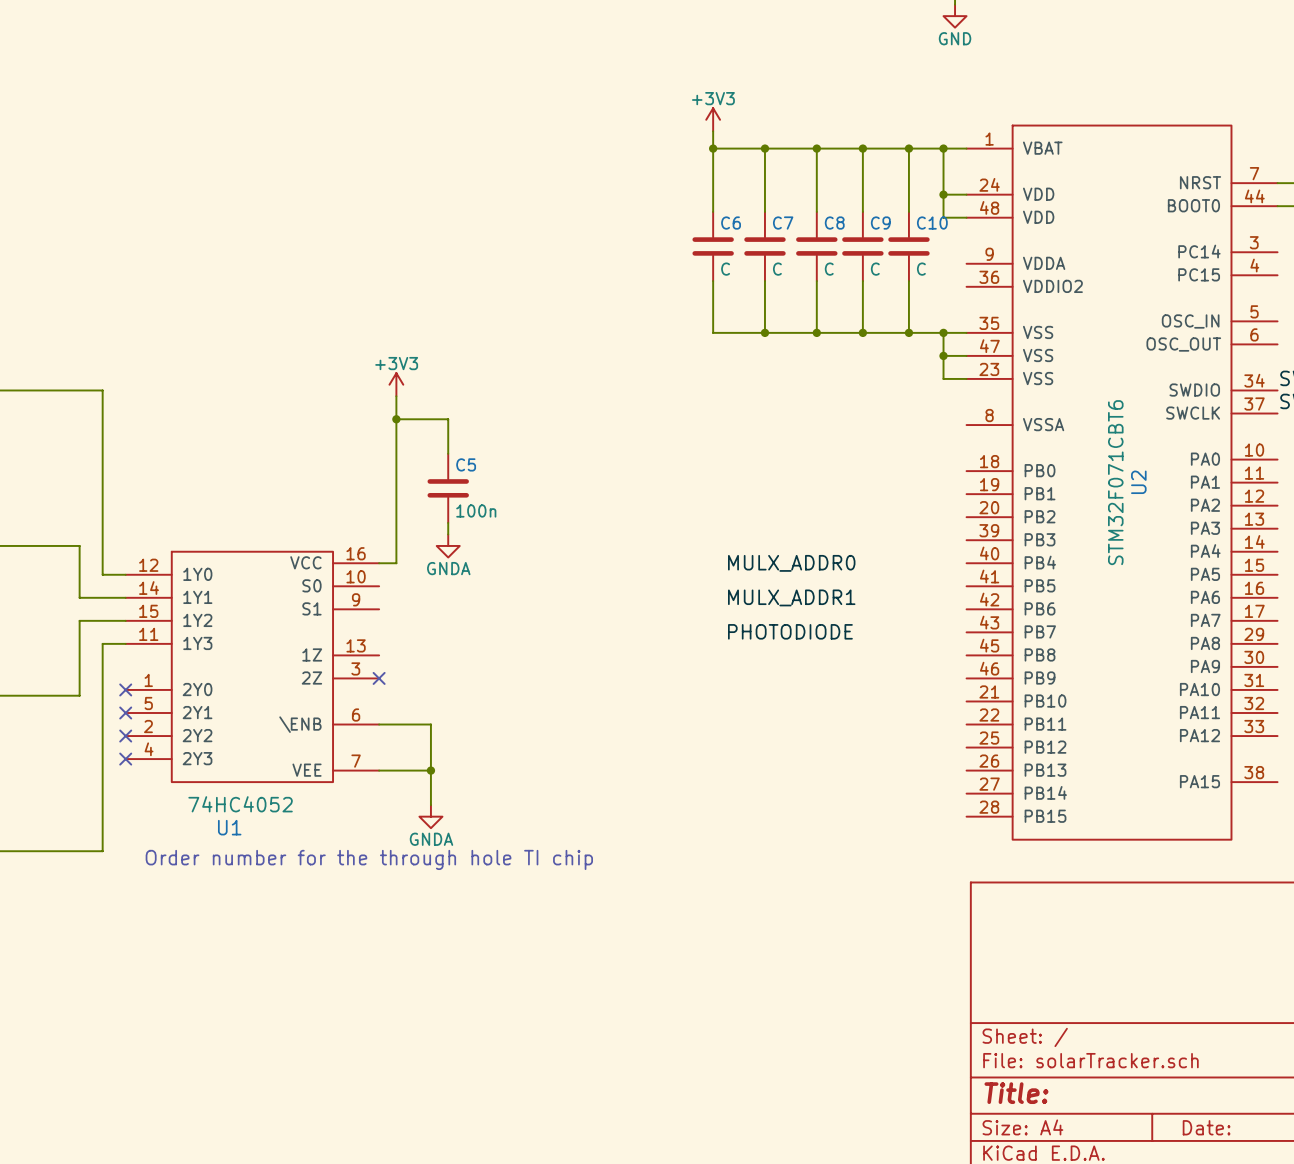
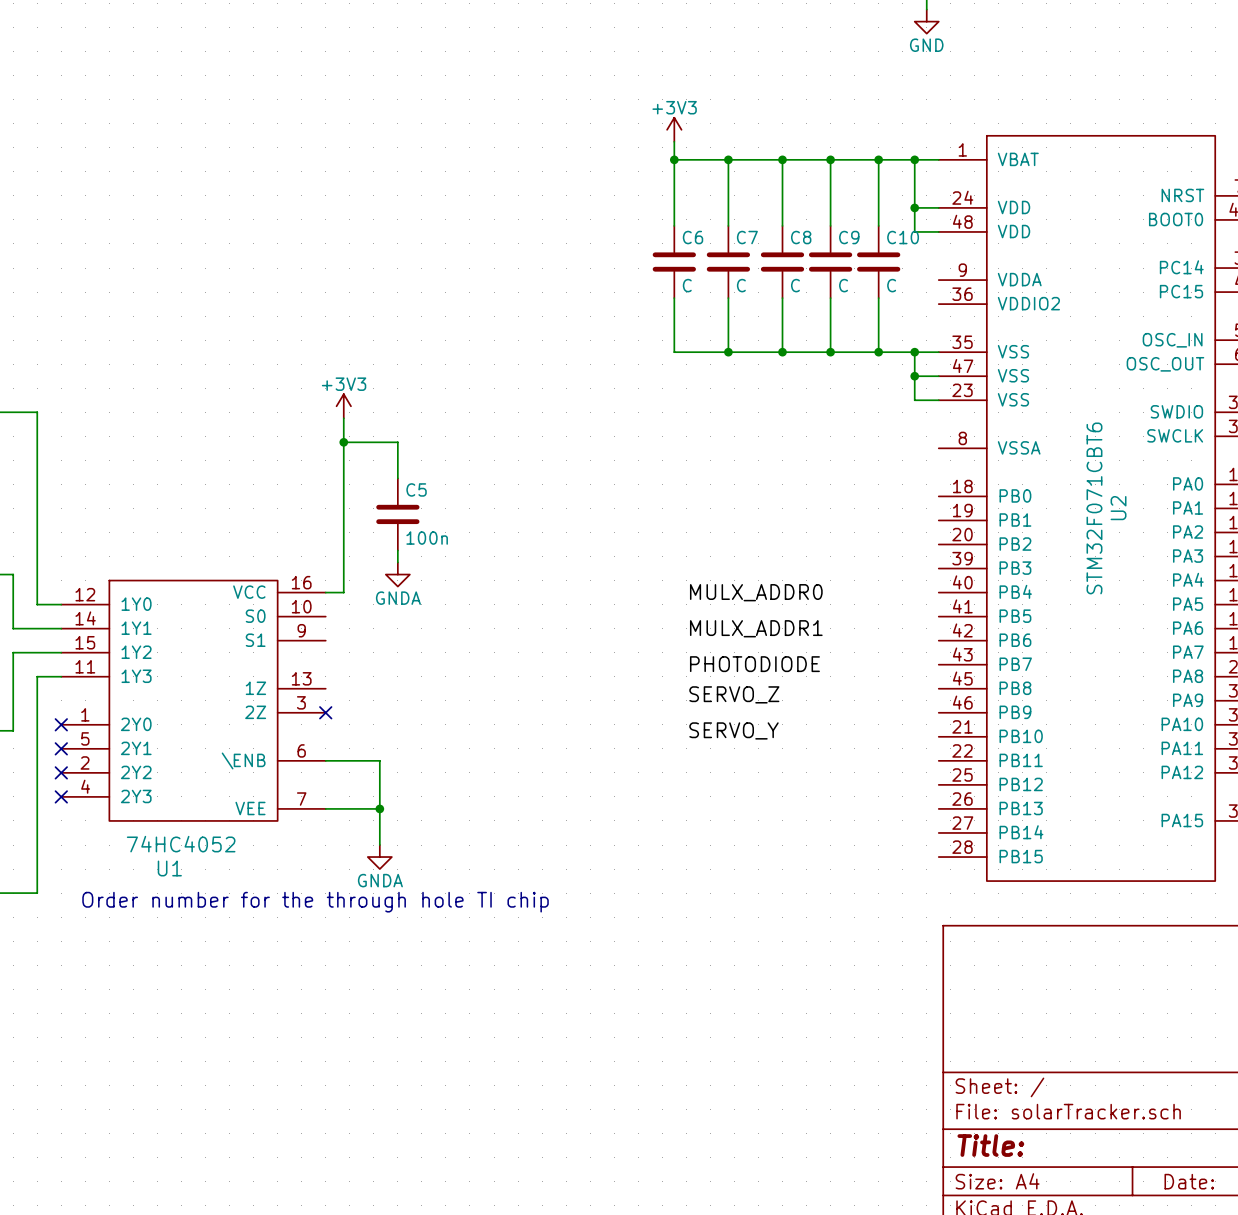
label: none -> SERVO_Z (734, 694)
label: none -> SERVO_Y (734, 730)

